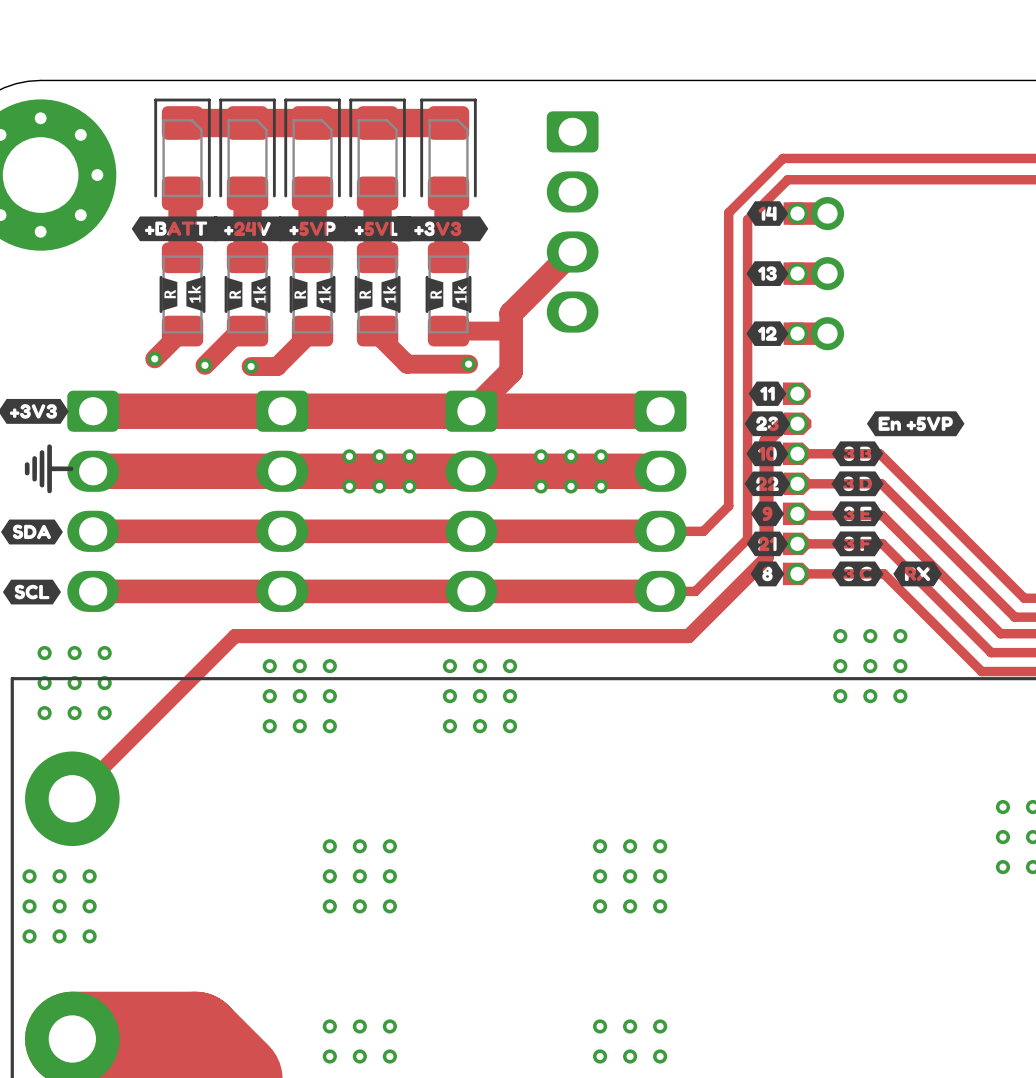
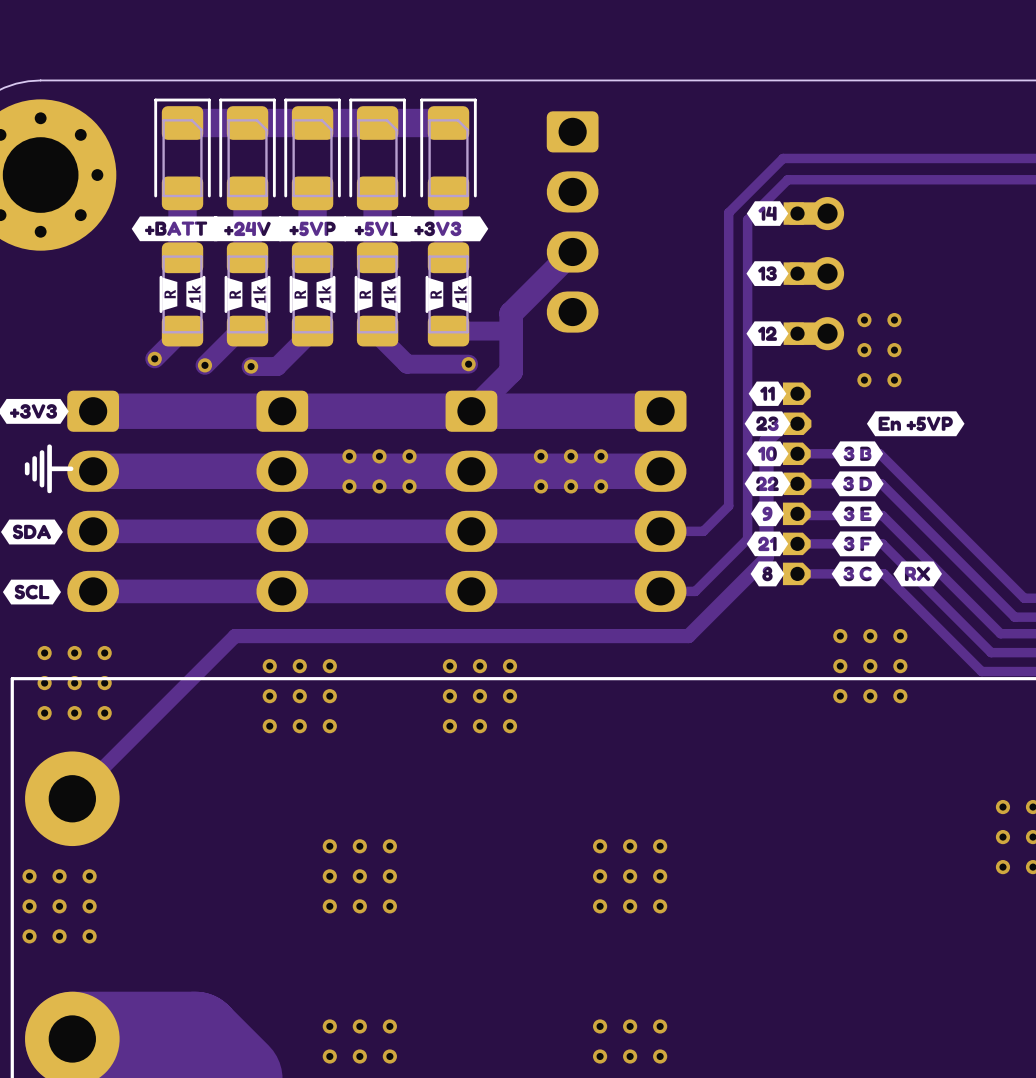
via: none -> (864, 320)
via: none -> (894, 320)
via: none -> (864, 350)
via: none -> (894, 350)
via: none -> (864, 380)
via: none -> (894, 380)

